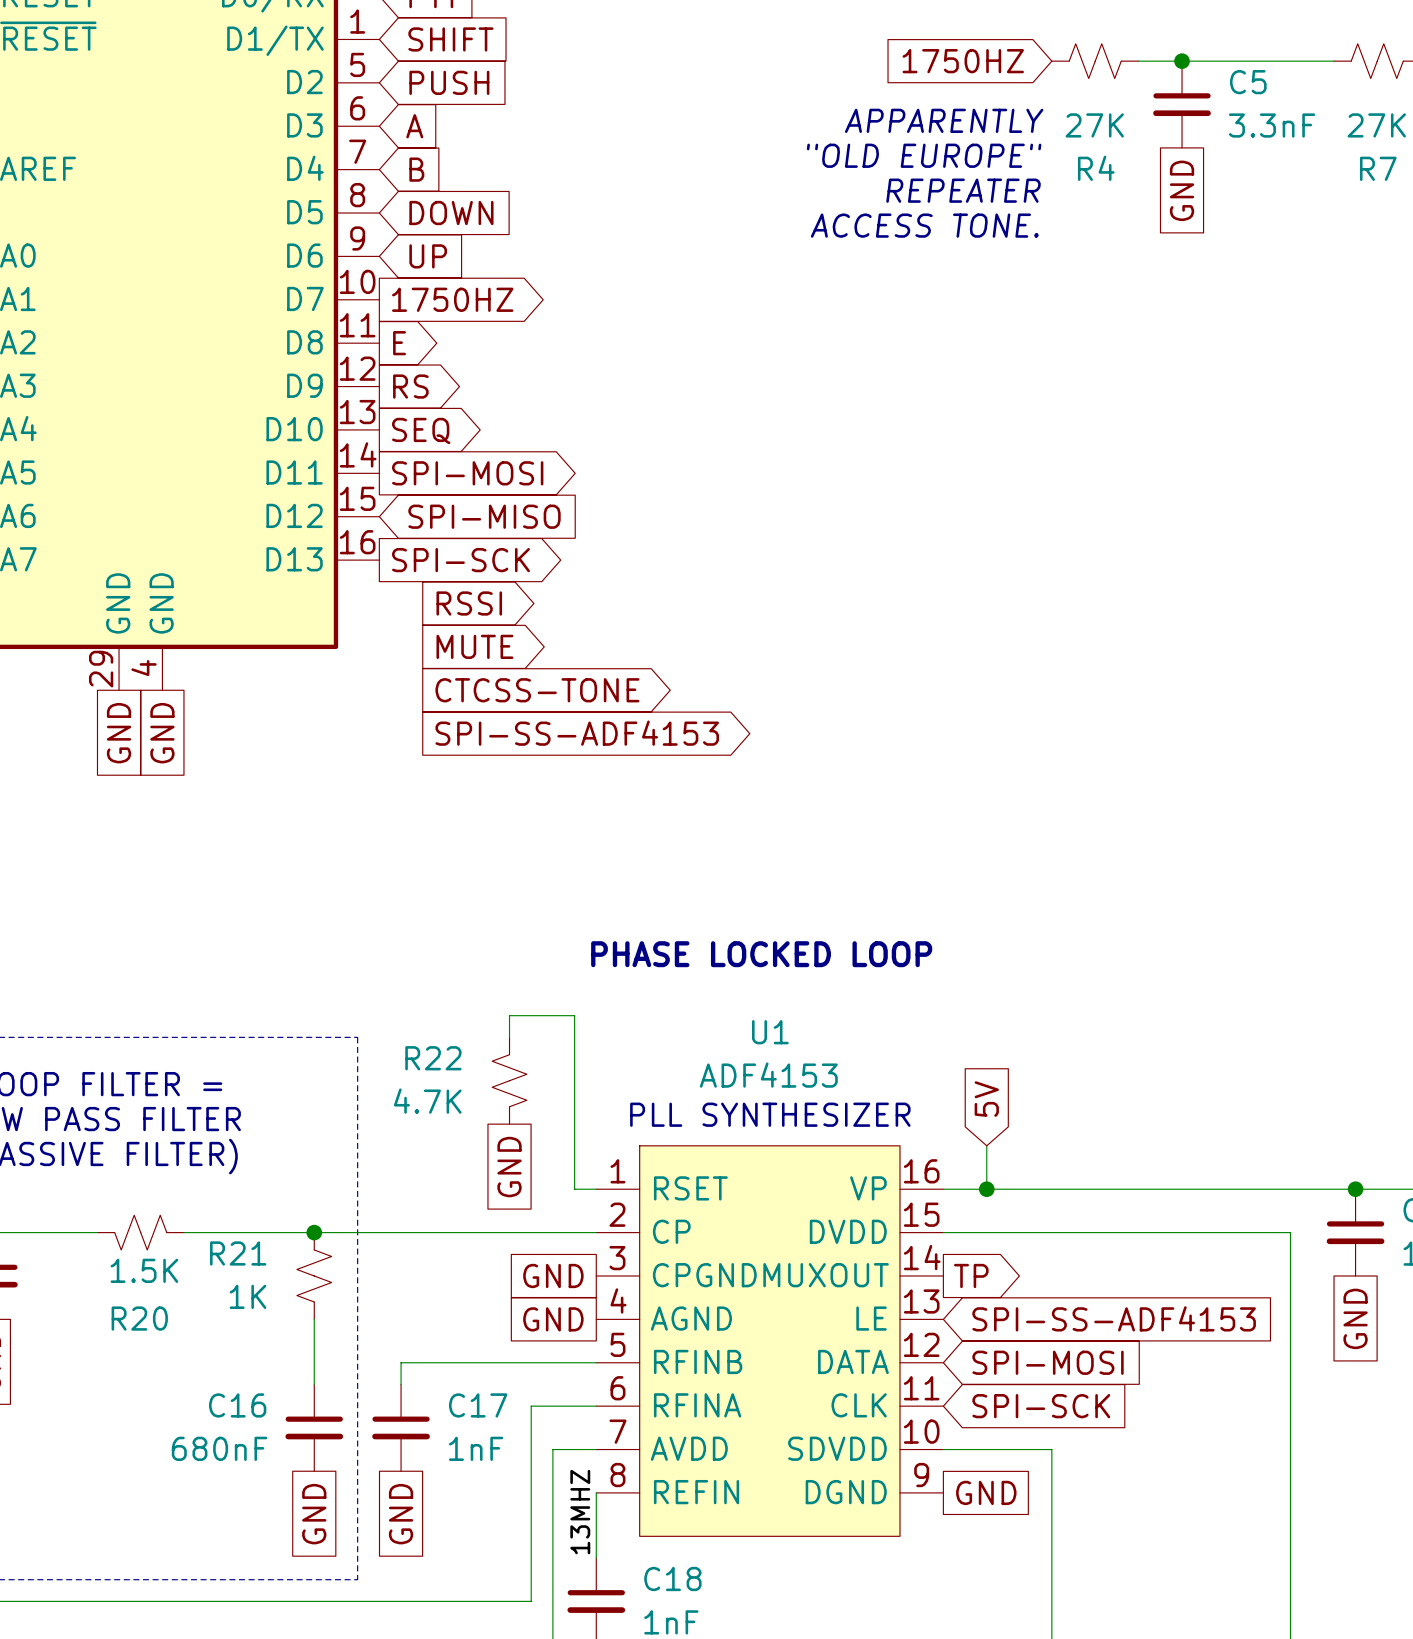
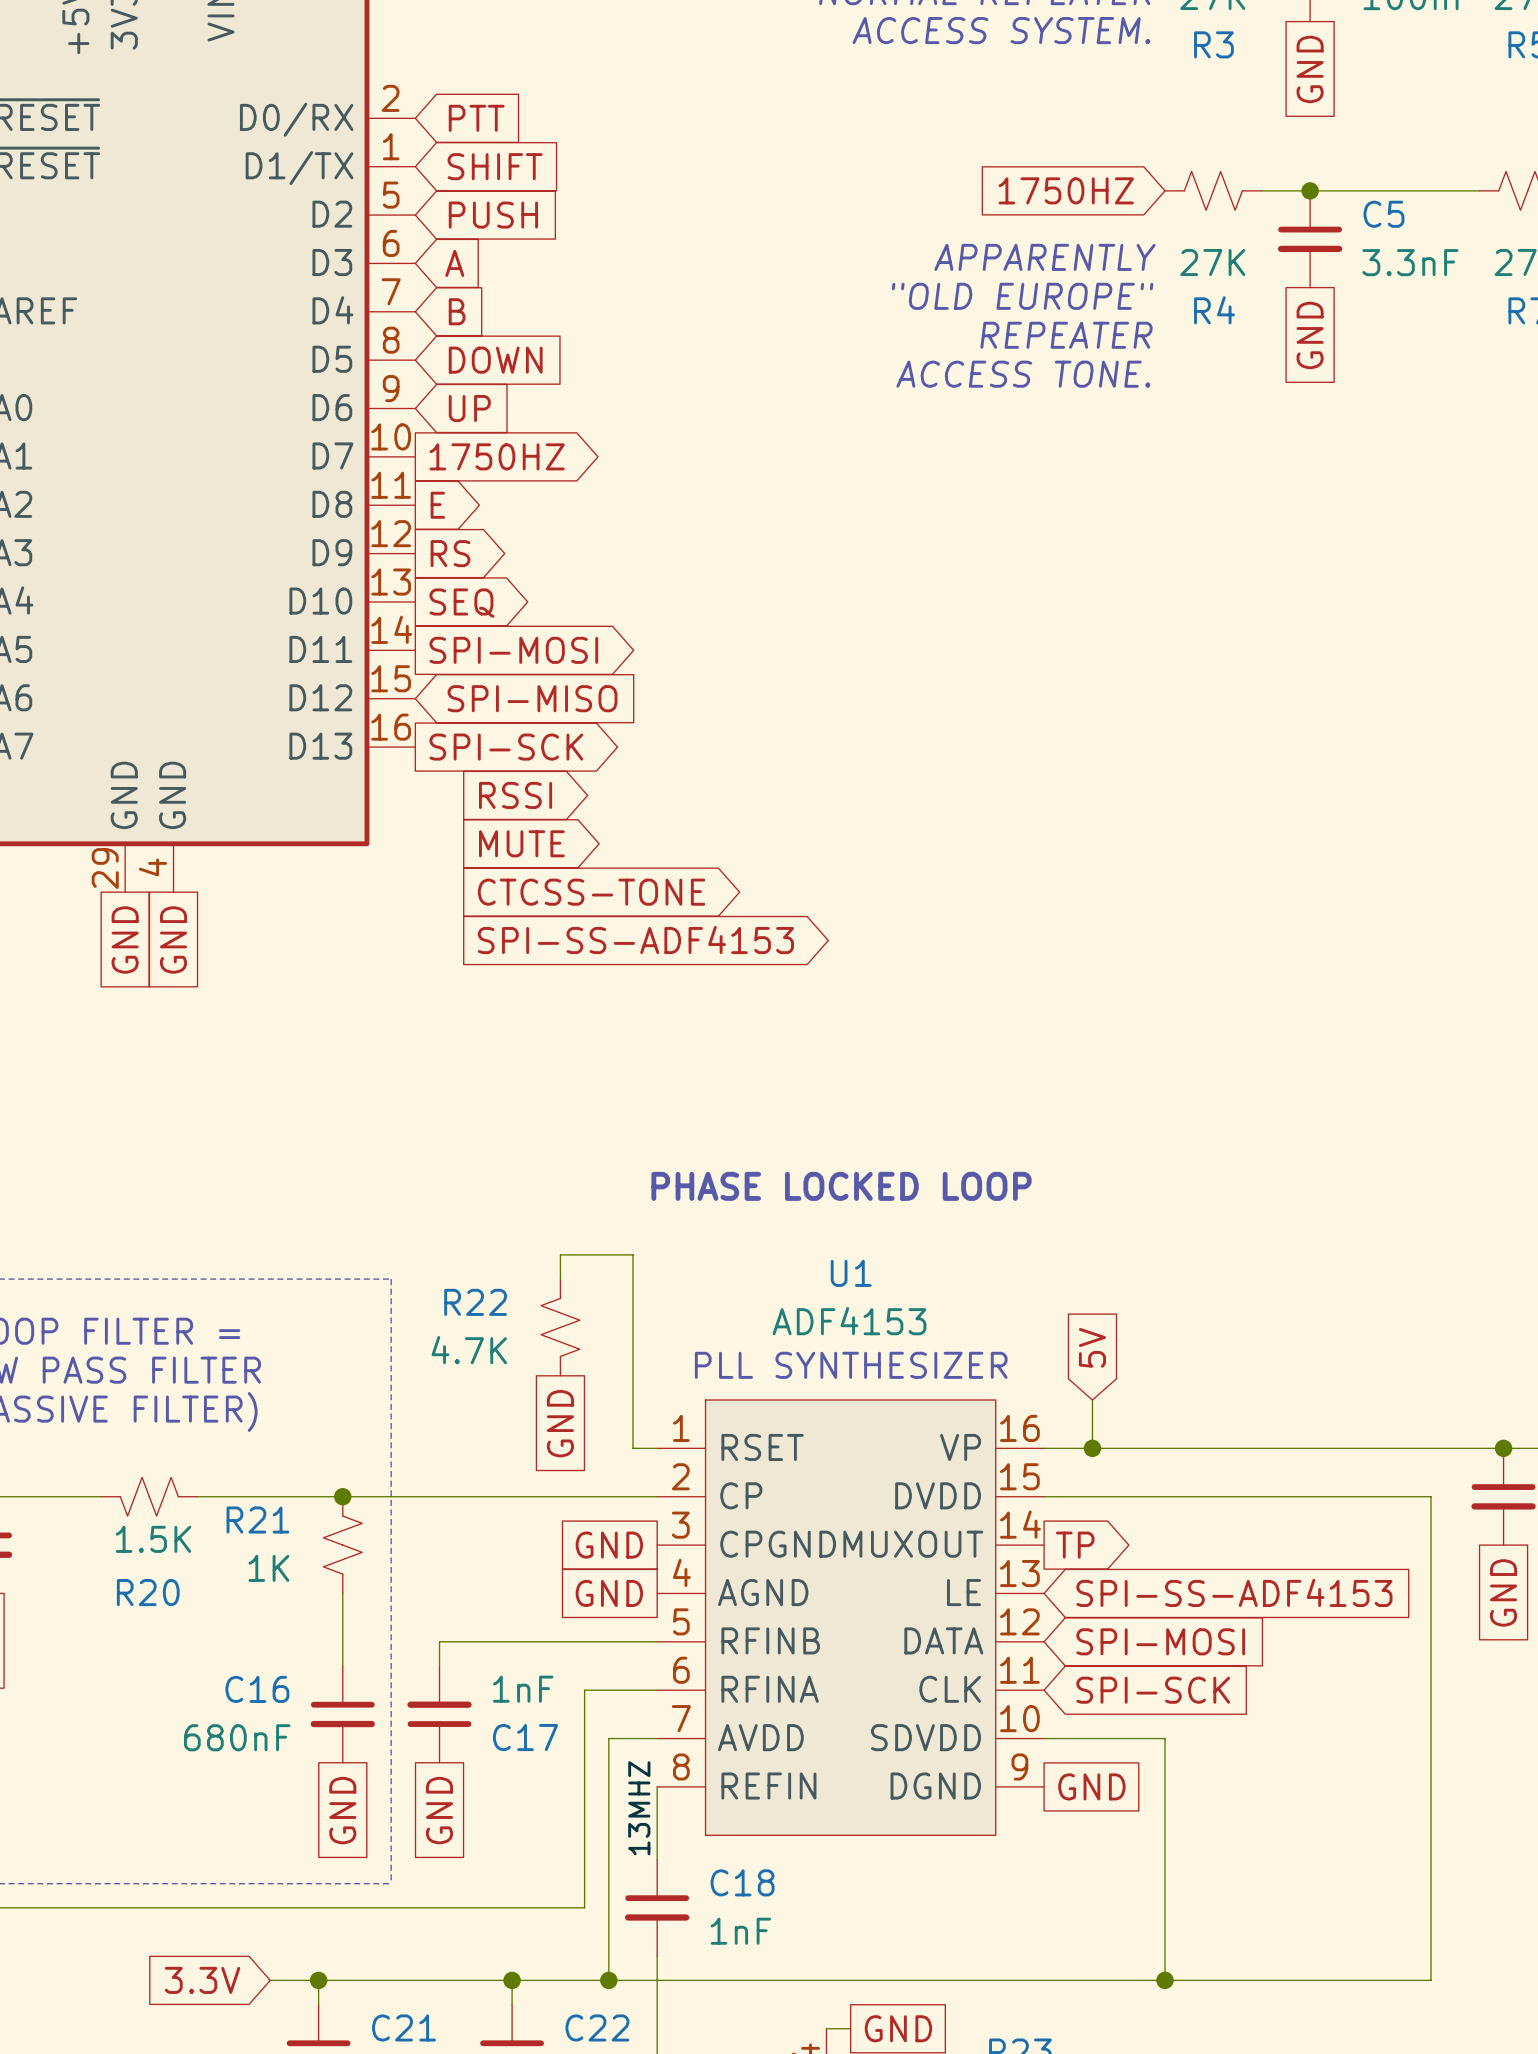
C17 name position: C17 (478, 1405) -> C17 (525, 1737)
C17 rotation: 0° (401, 1427) -> 180° (439, 1714)
C17 value position: 1nF (476, 1448) -> 1nF (523, 1689)

